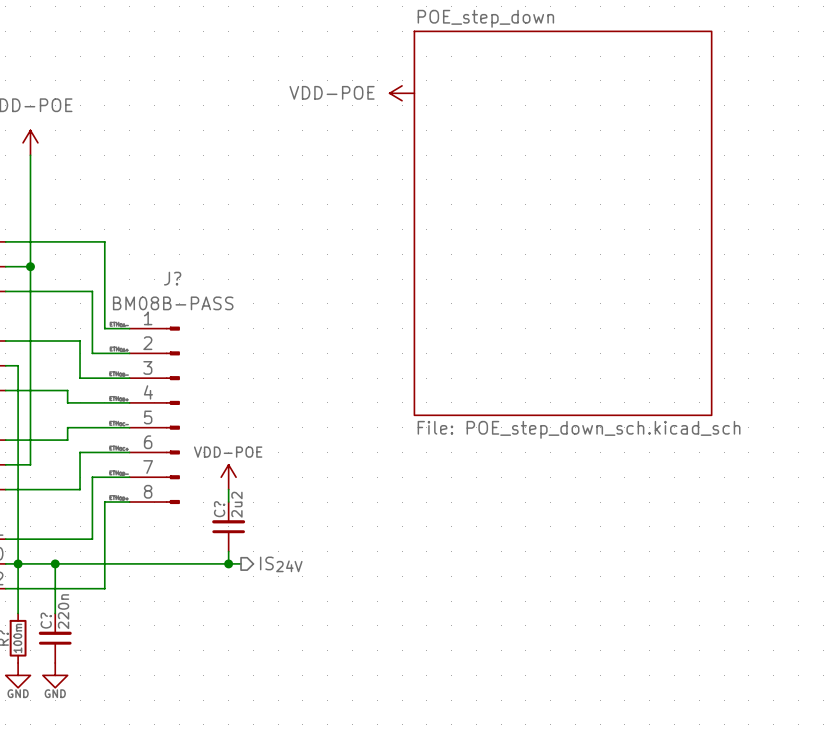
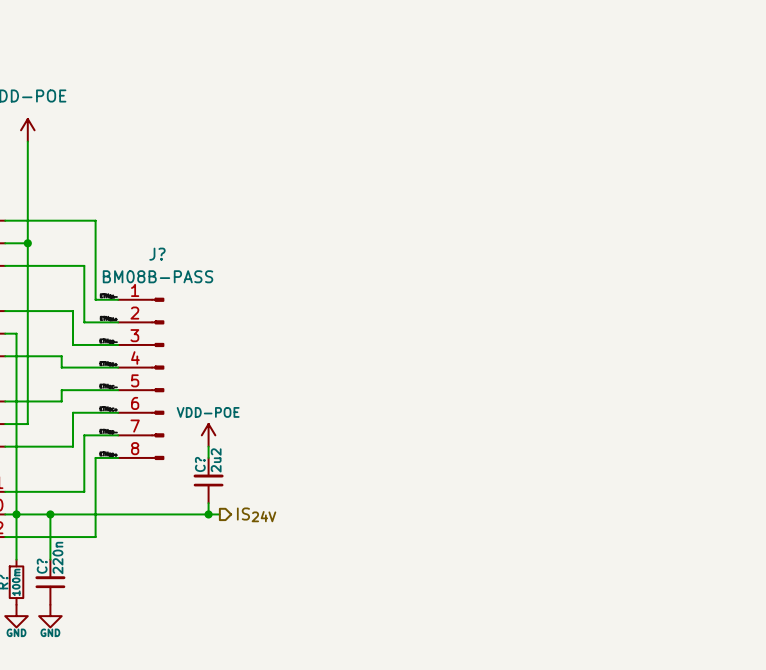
power symbol: VDD-POE (402, 93) -> none
sheet POE_step_down: File: POE_step_down_sch.kicad_sch (563, 223) -> none

